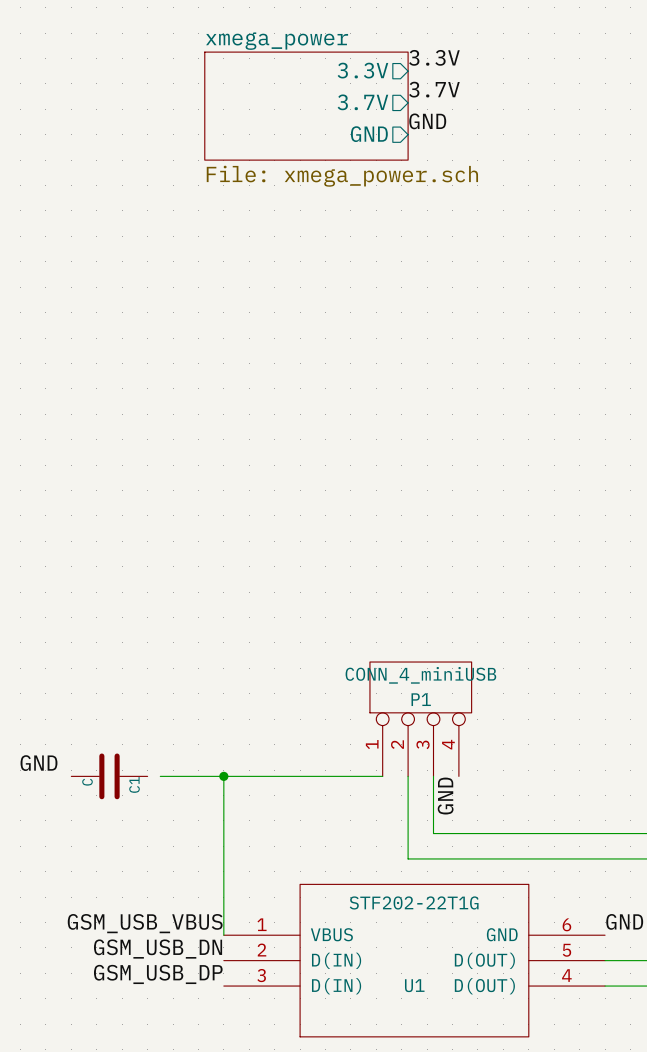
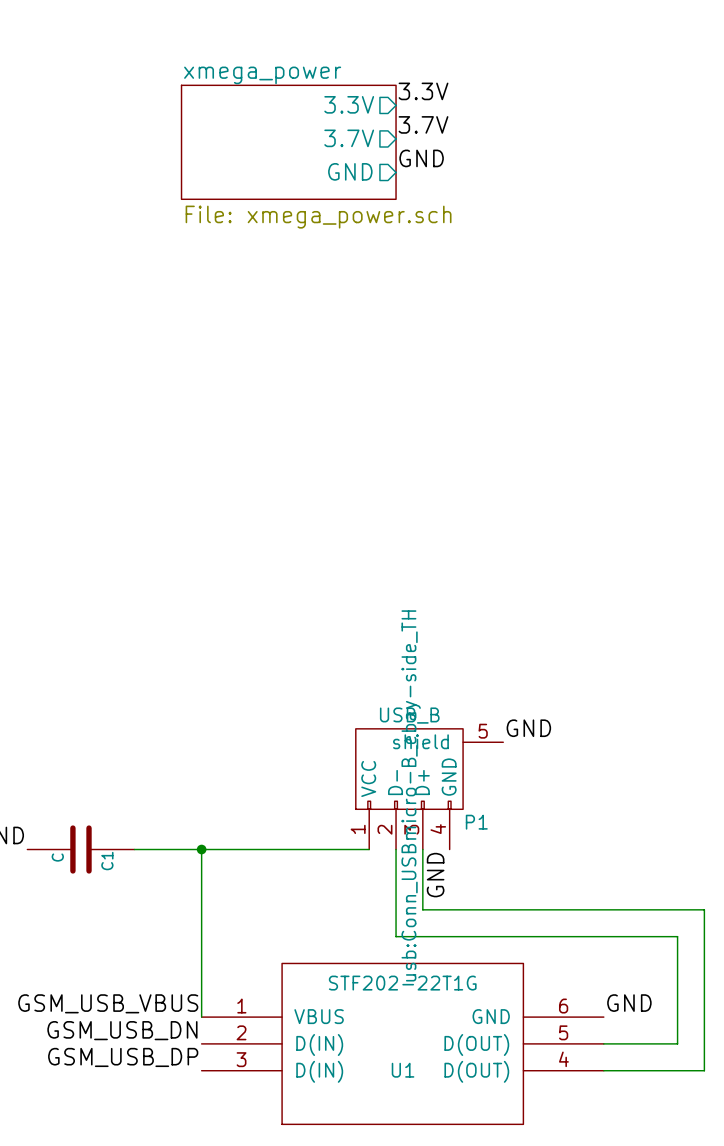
label: none -> GND (528, 728)
P1 symbol: [369, 662, 472, 777] -> [355, 728, 504, 850]
P1 value: CONN_4_miniUSB (420, 675) -> USB_B (409, 715)
P1 name position: P1 (421, 699) -> P1 (476, 822)
P1 text: none -> usb:Conn_USBmicro-B_ebay-side_TH (411, 795)
C1 symbol: [71, 753, 148, 800] -> [27, 825, 135, 874]

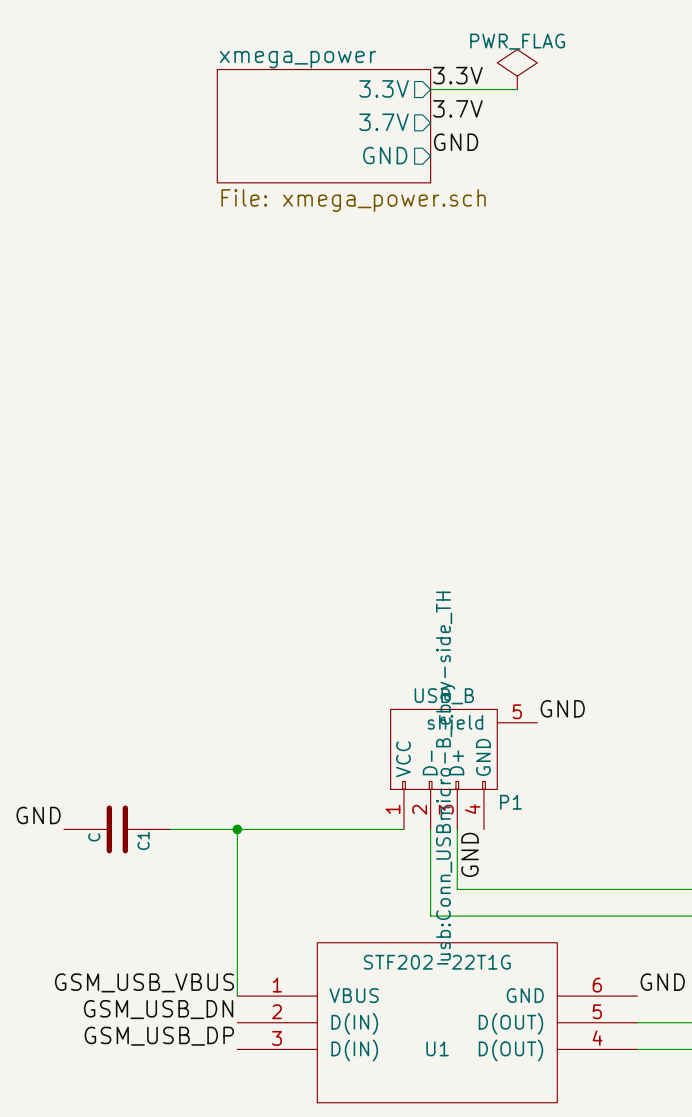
power symbol: none -> PWR_FLAG (517, 69)
wire: none -> (430, 89) (517, 89)

